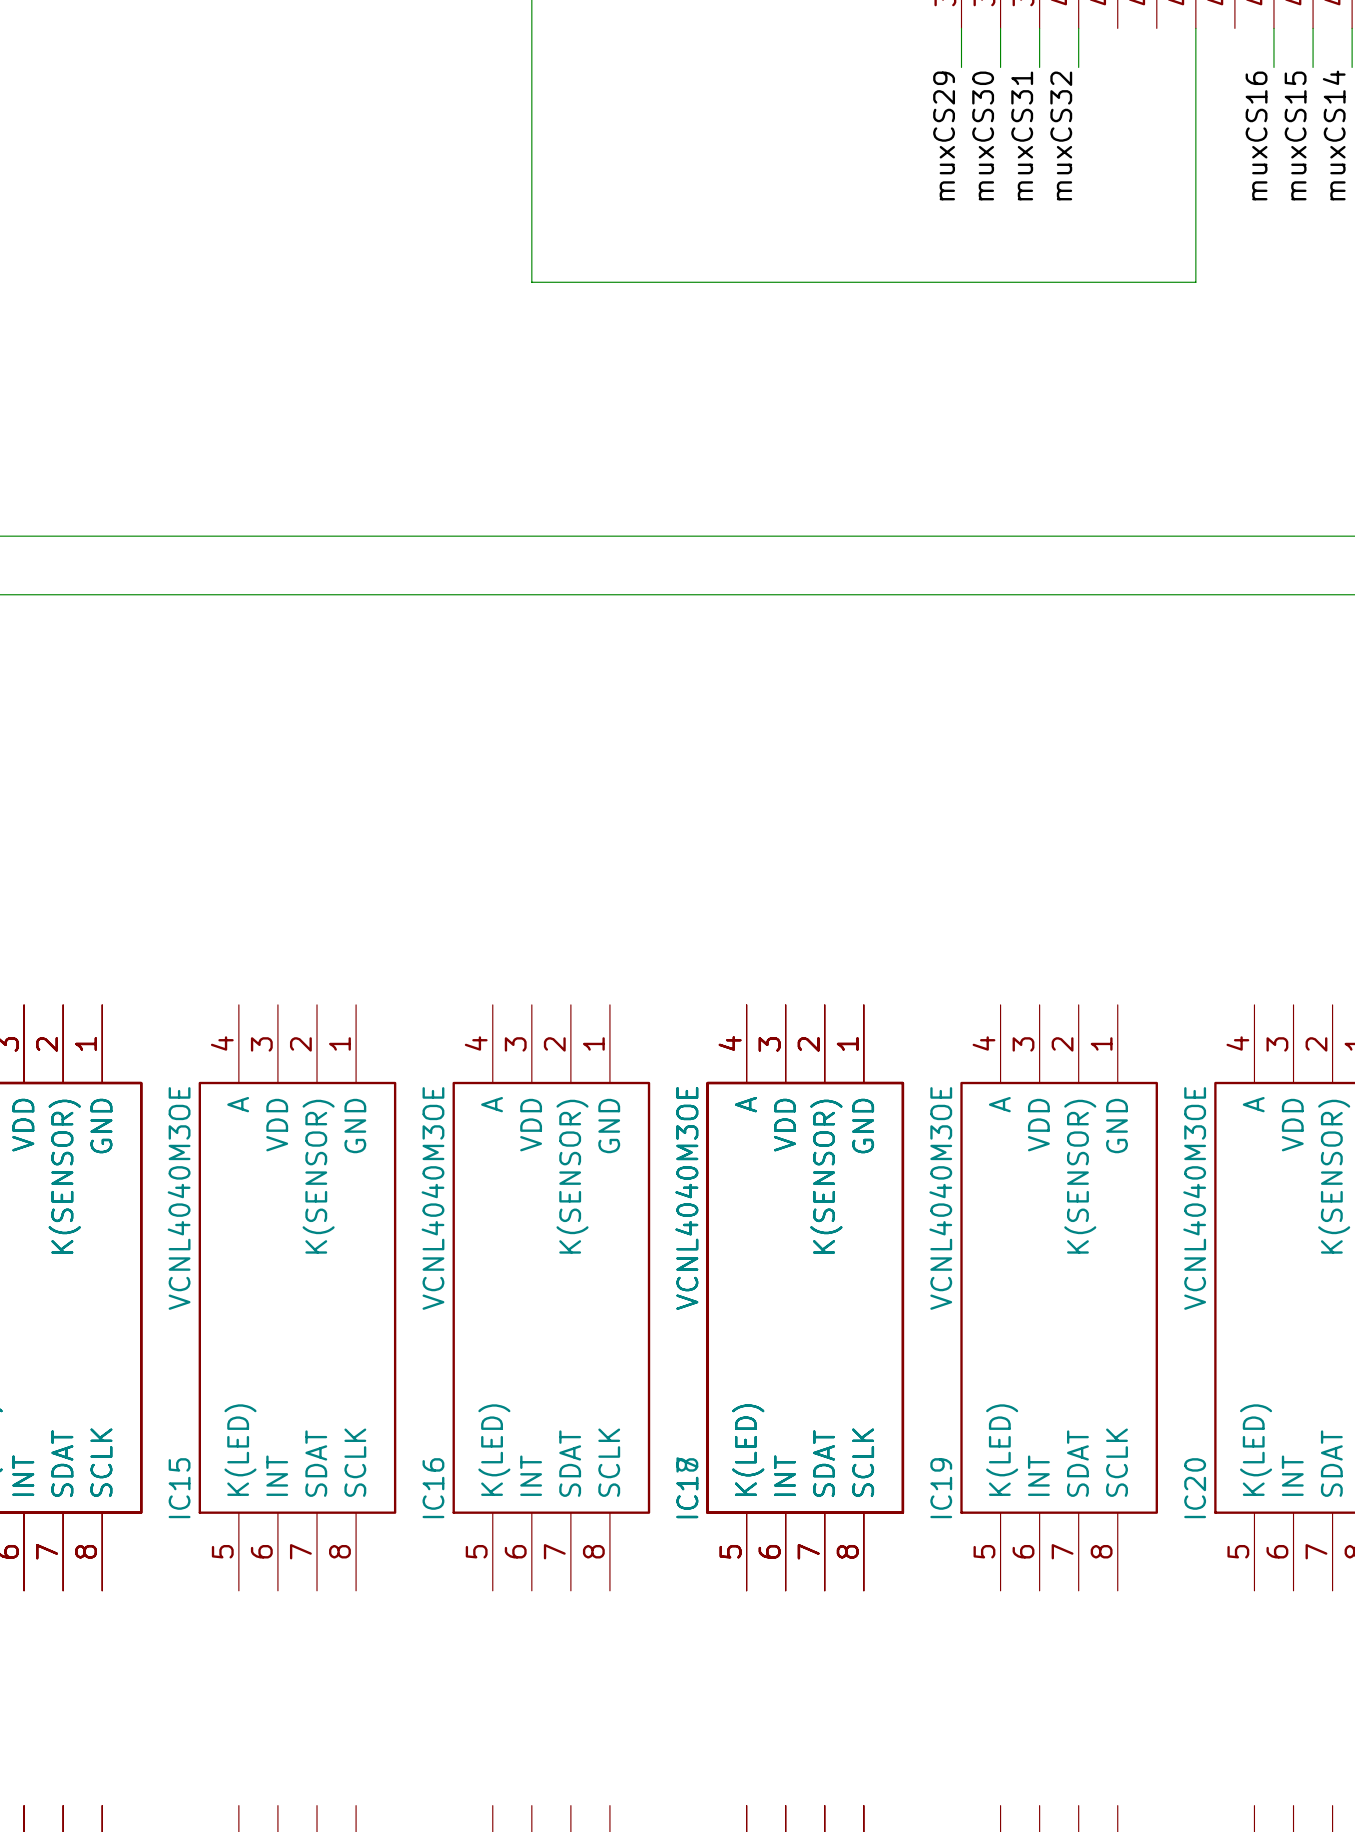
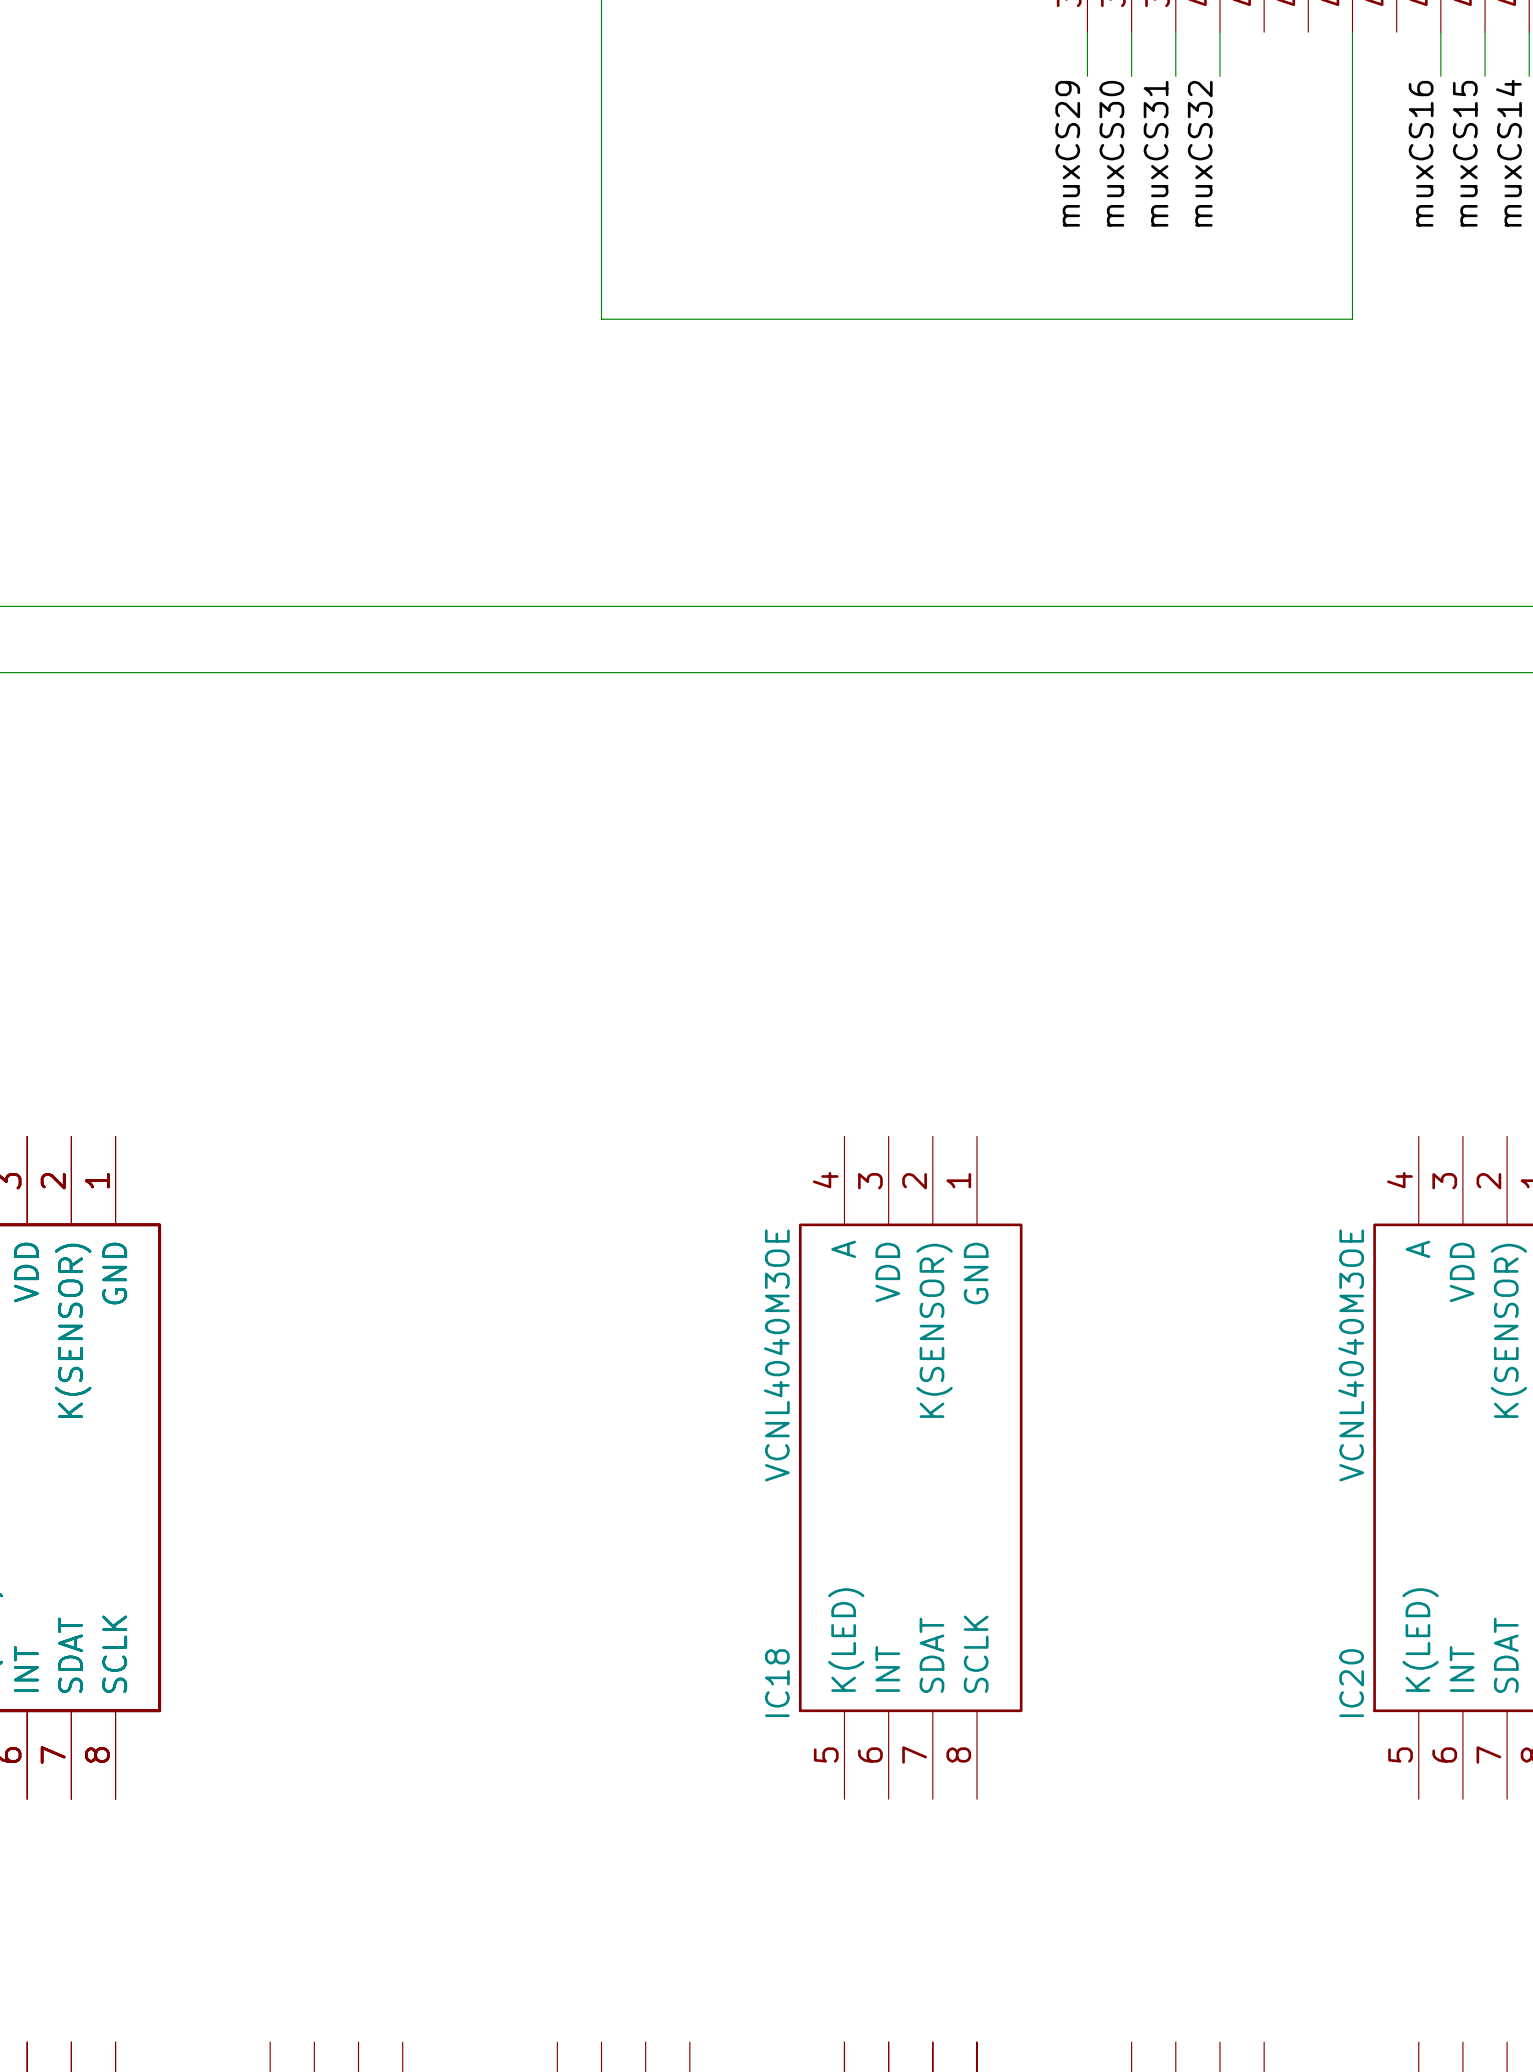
IC15: VCNL4040M3OE (297, 1297) -> none
IC16: VCNL4040M3OE (551, 1297) -> none
part: VCNL4040M3OE (805, 1297) -> none
IC19: VCNL4040M3OE (1059, 1297) -> none

